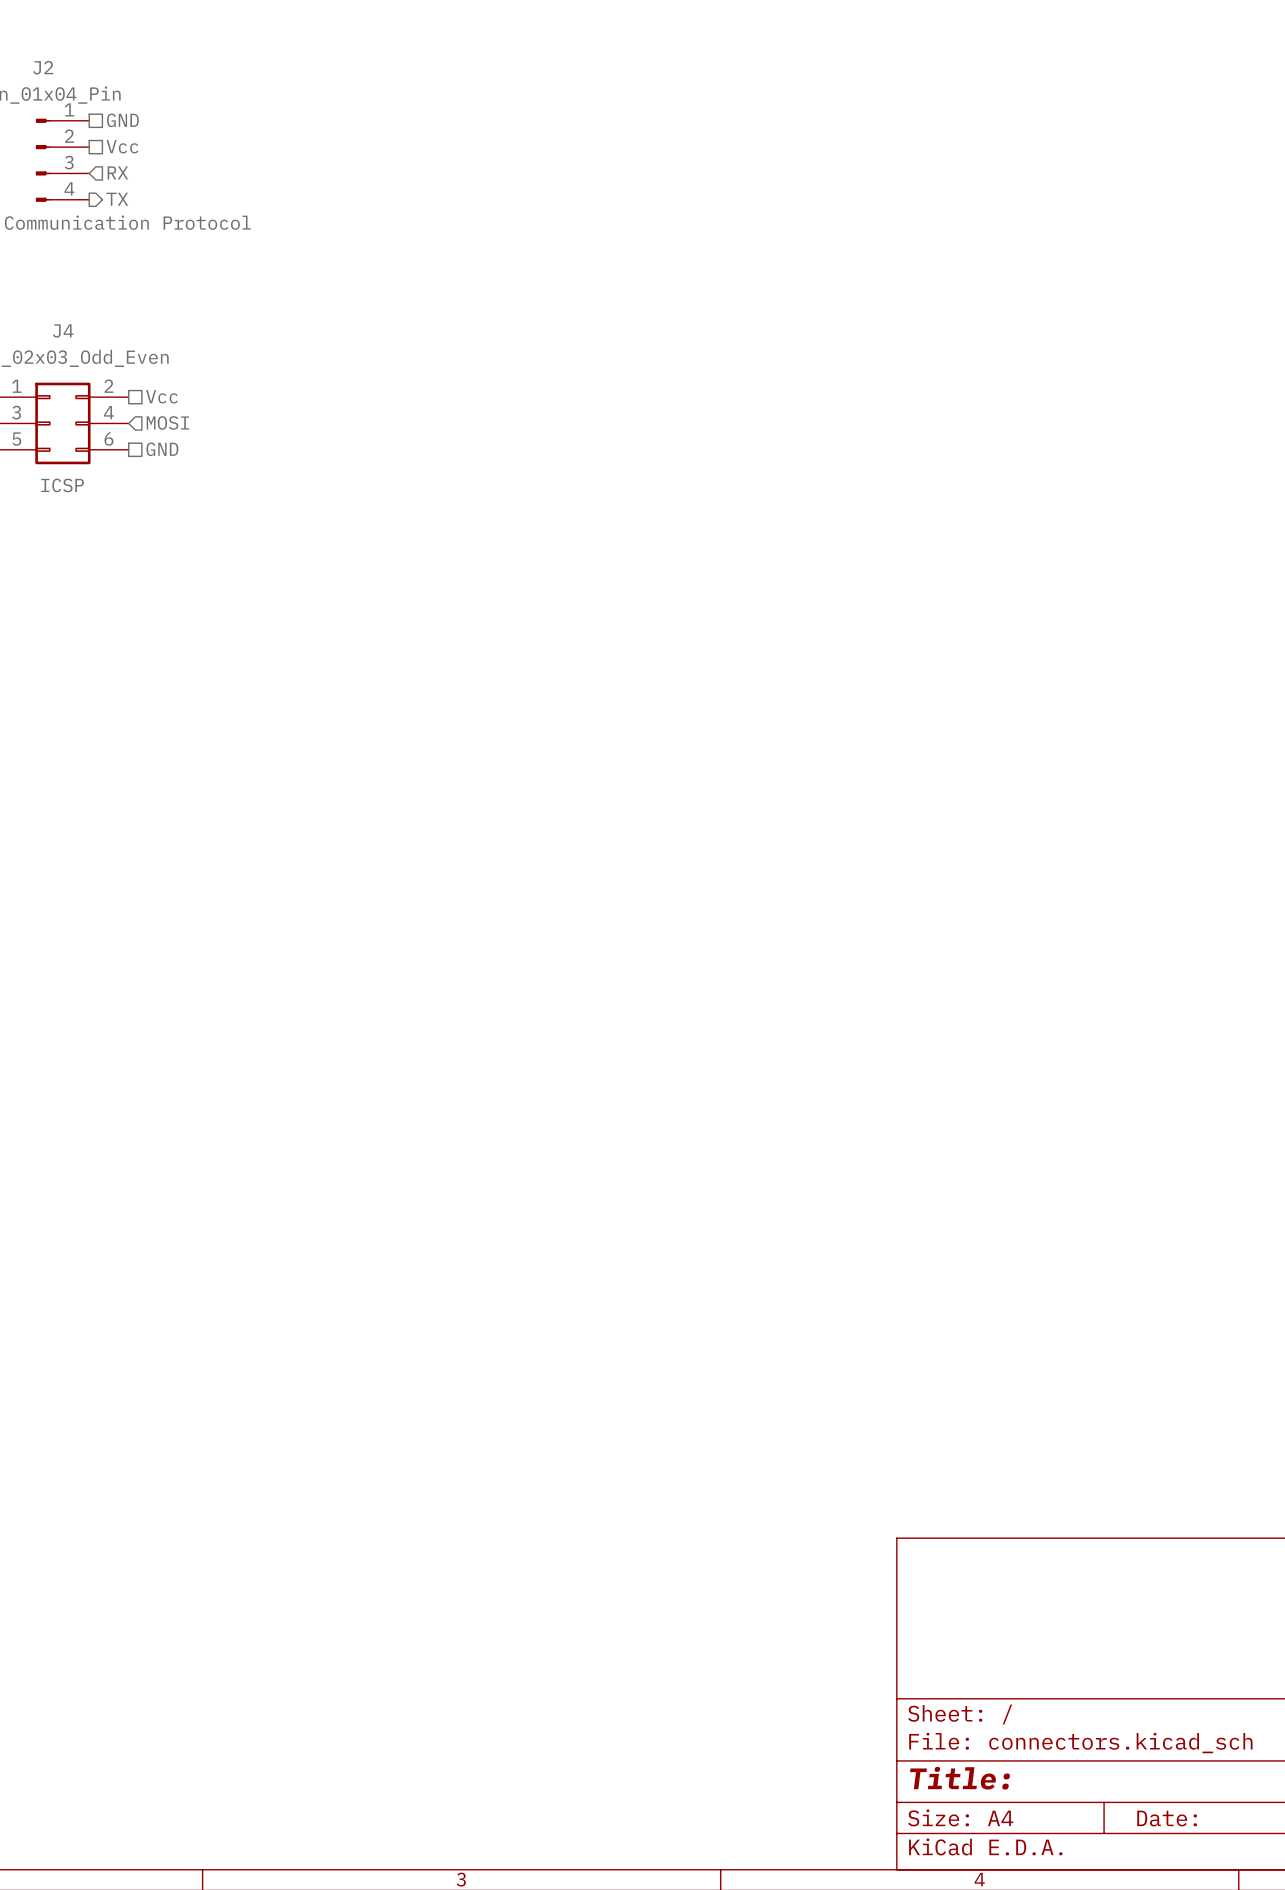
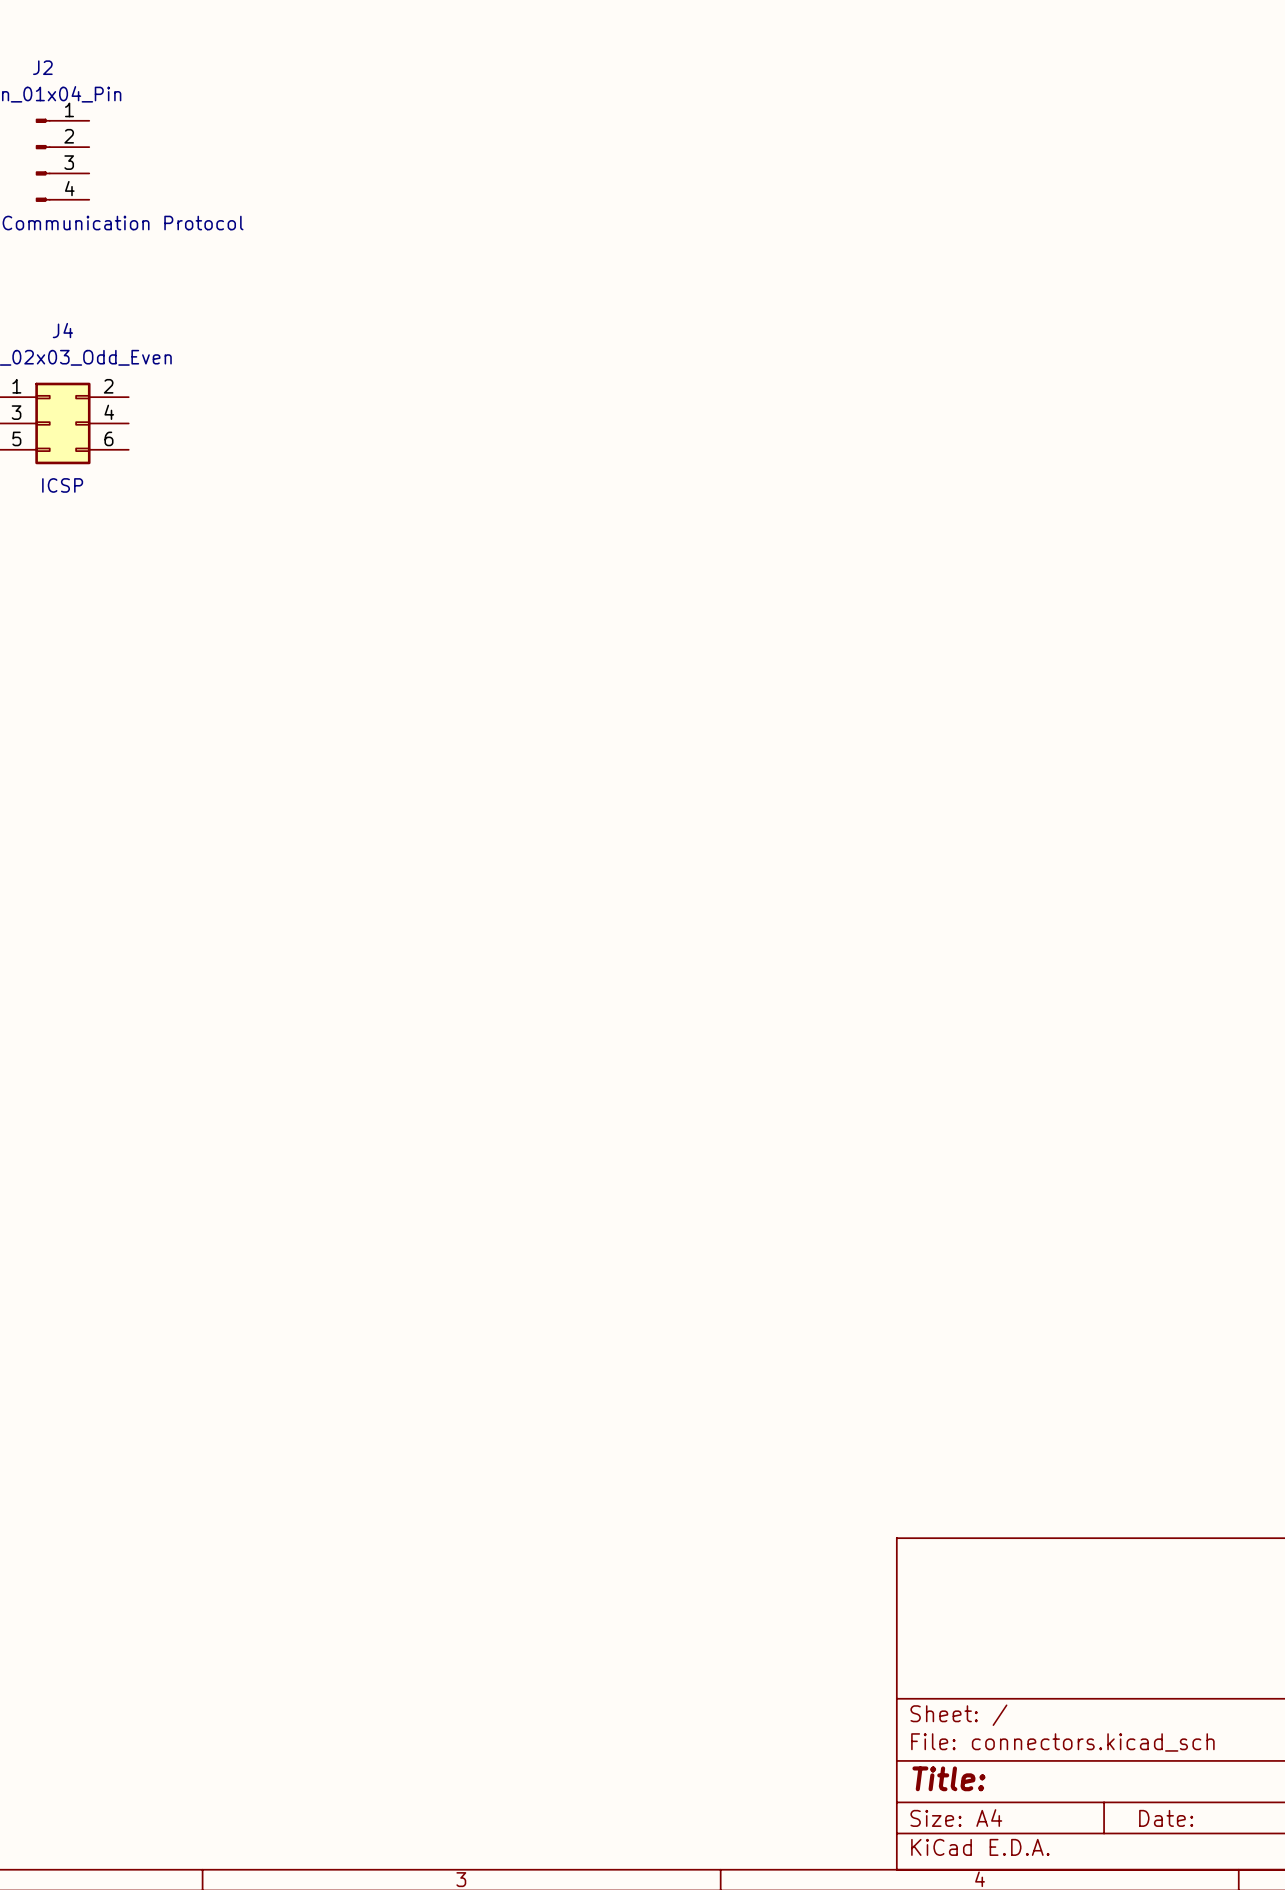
hierarchical label: GND (122, 120) -> none
hierarchical label: Vcc (122, 146) -> none
hierarchical label: RX (117, 172) -> none
hierarchical label: TX (117, 199) -> none
hierarchical label: Vcc (161, 396) -> none
hierarchical label: MOSI (167, 422) -> none
hierarchical label: GND (162, 449) -> none

